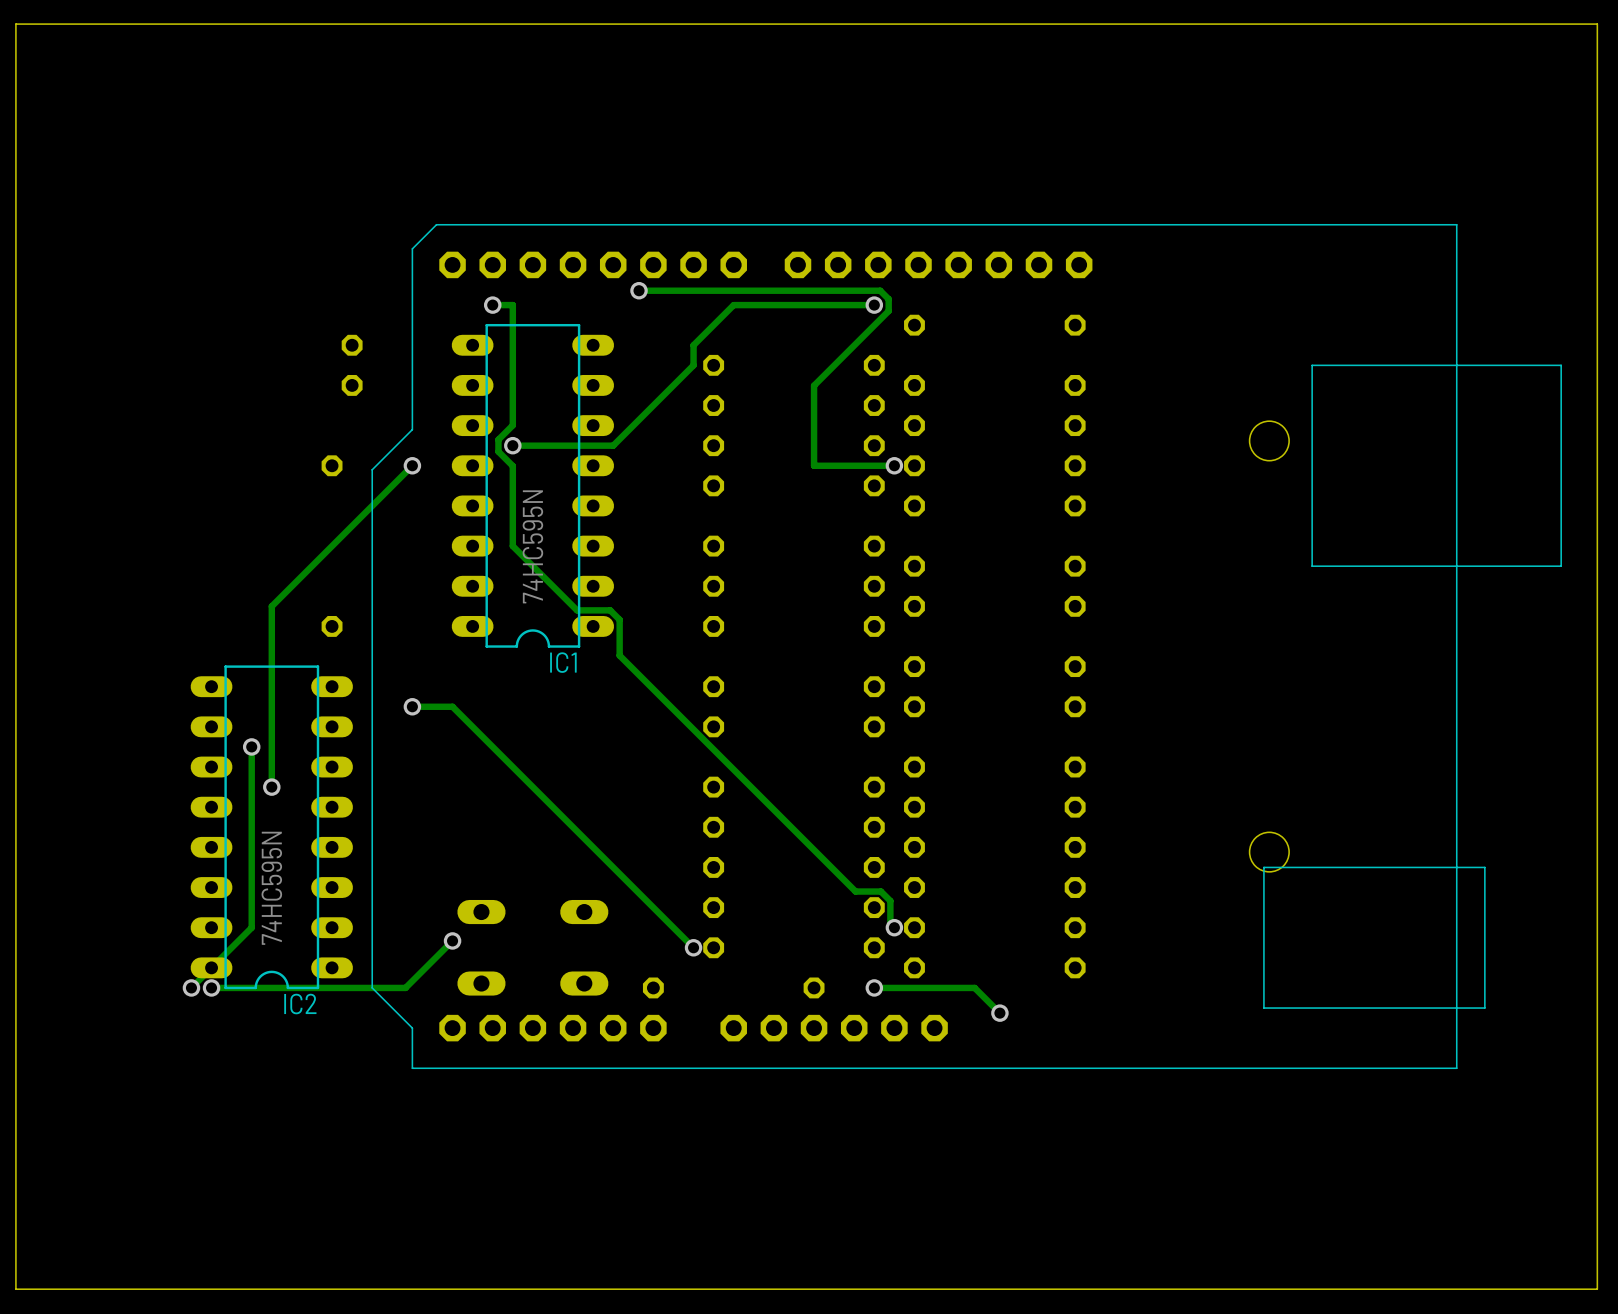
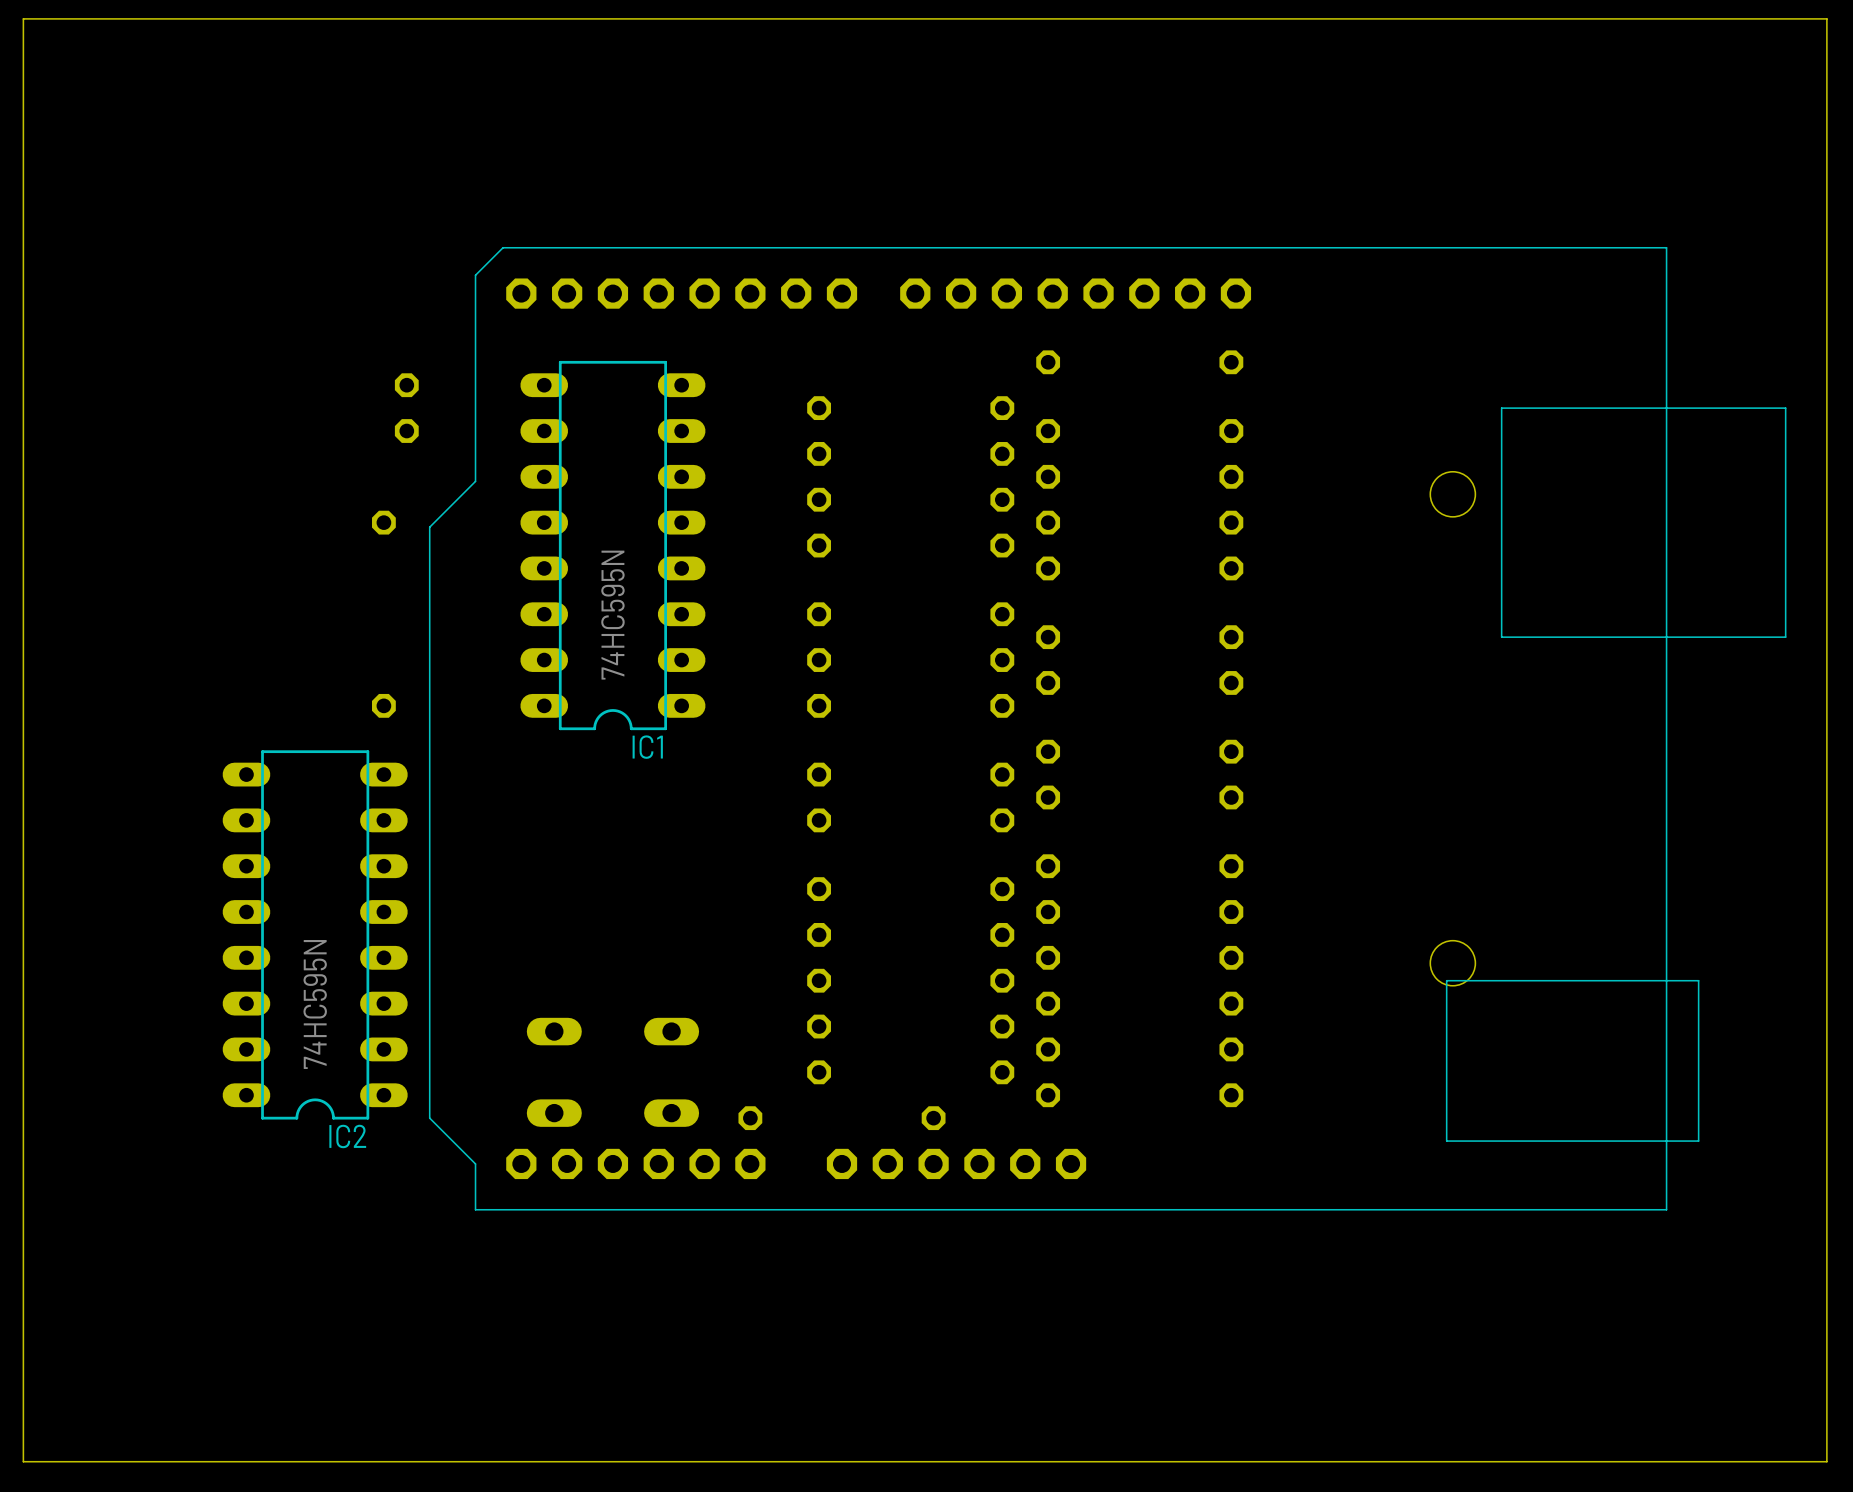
track: (639, 290) (880, 290) (888, 299) (888, 311) (814, 385) (814, 465) (894, 465) -> none
via: (639, 290) -> none
track: (492, 305) (512, 305) (512, 425) (498, 439) (498, 451) (512, 466) (512, 546) (577, 610) (610, 610) (619, 619) (619, 655) (855, 891) (880, 891) (890, 900) (890, 923) (894, 927) -> none
via: (492, 305) -> none
track: (874, 305) (733, 305) (693, 345) (693, 365) (613, 445) (512, 445) -> none
via: (874, 305) -> none
via: (512, 445) -> none
track: (412, 465) (271, 606) (271, 787) -> none
via: (412, 465) -> none
via: (894, 465) -> none
track: (412, 706) (452, 706) (693, 947) -> none
via: (412, 706) -> none
track: (251, 746) (251, 927) (191, 987) -> none
via: (251, 746) -> none
via: (271, 787) -> none
via: (894, 927) -> none
track: (452, 940) (405, 987) (211, 987) -> none
via: (452, 940) -> none
via: (693, 947) -> none
via: (191, 987) -> none
via: (211, 987) -> none
track: (874, 987) (974, 987) (999, 1013) -> none
via: (874, 987) -> none
via: (999, 1013) -> none

